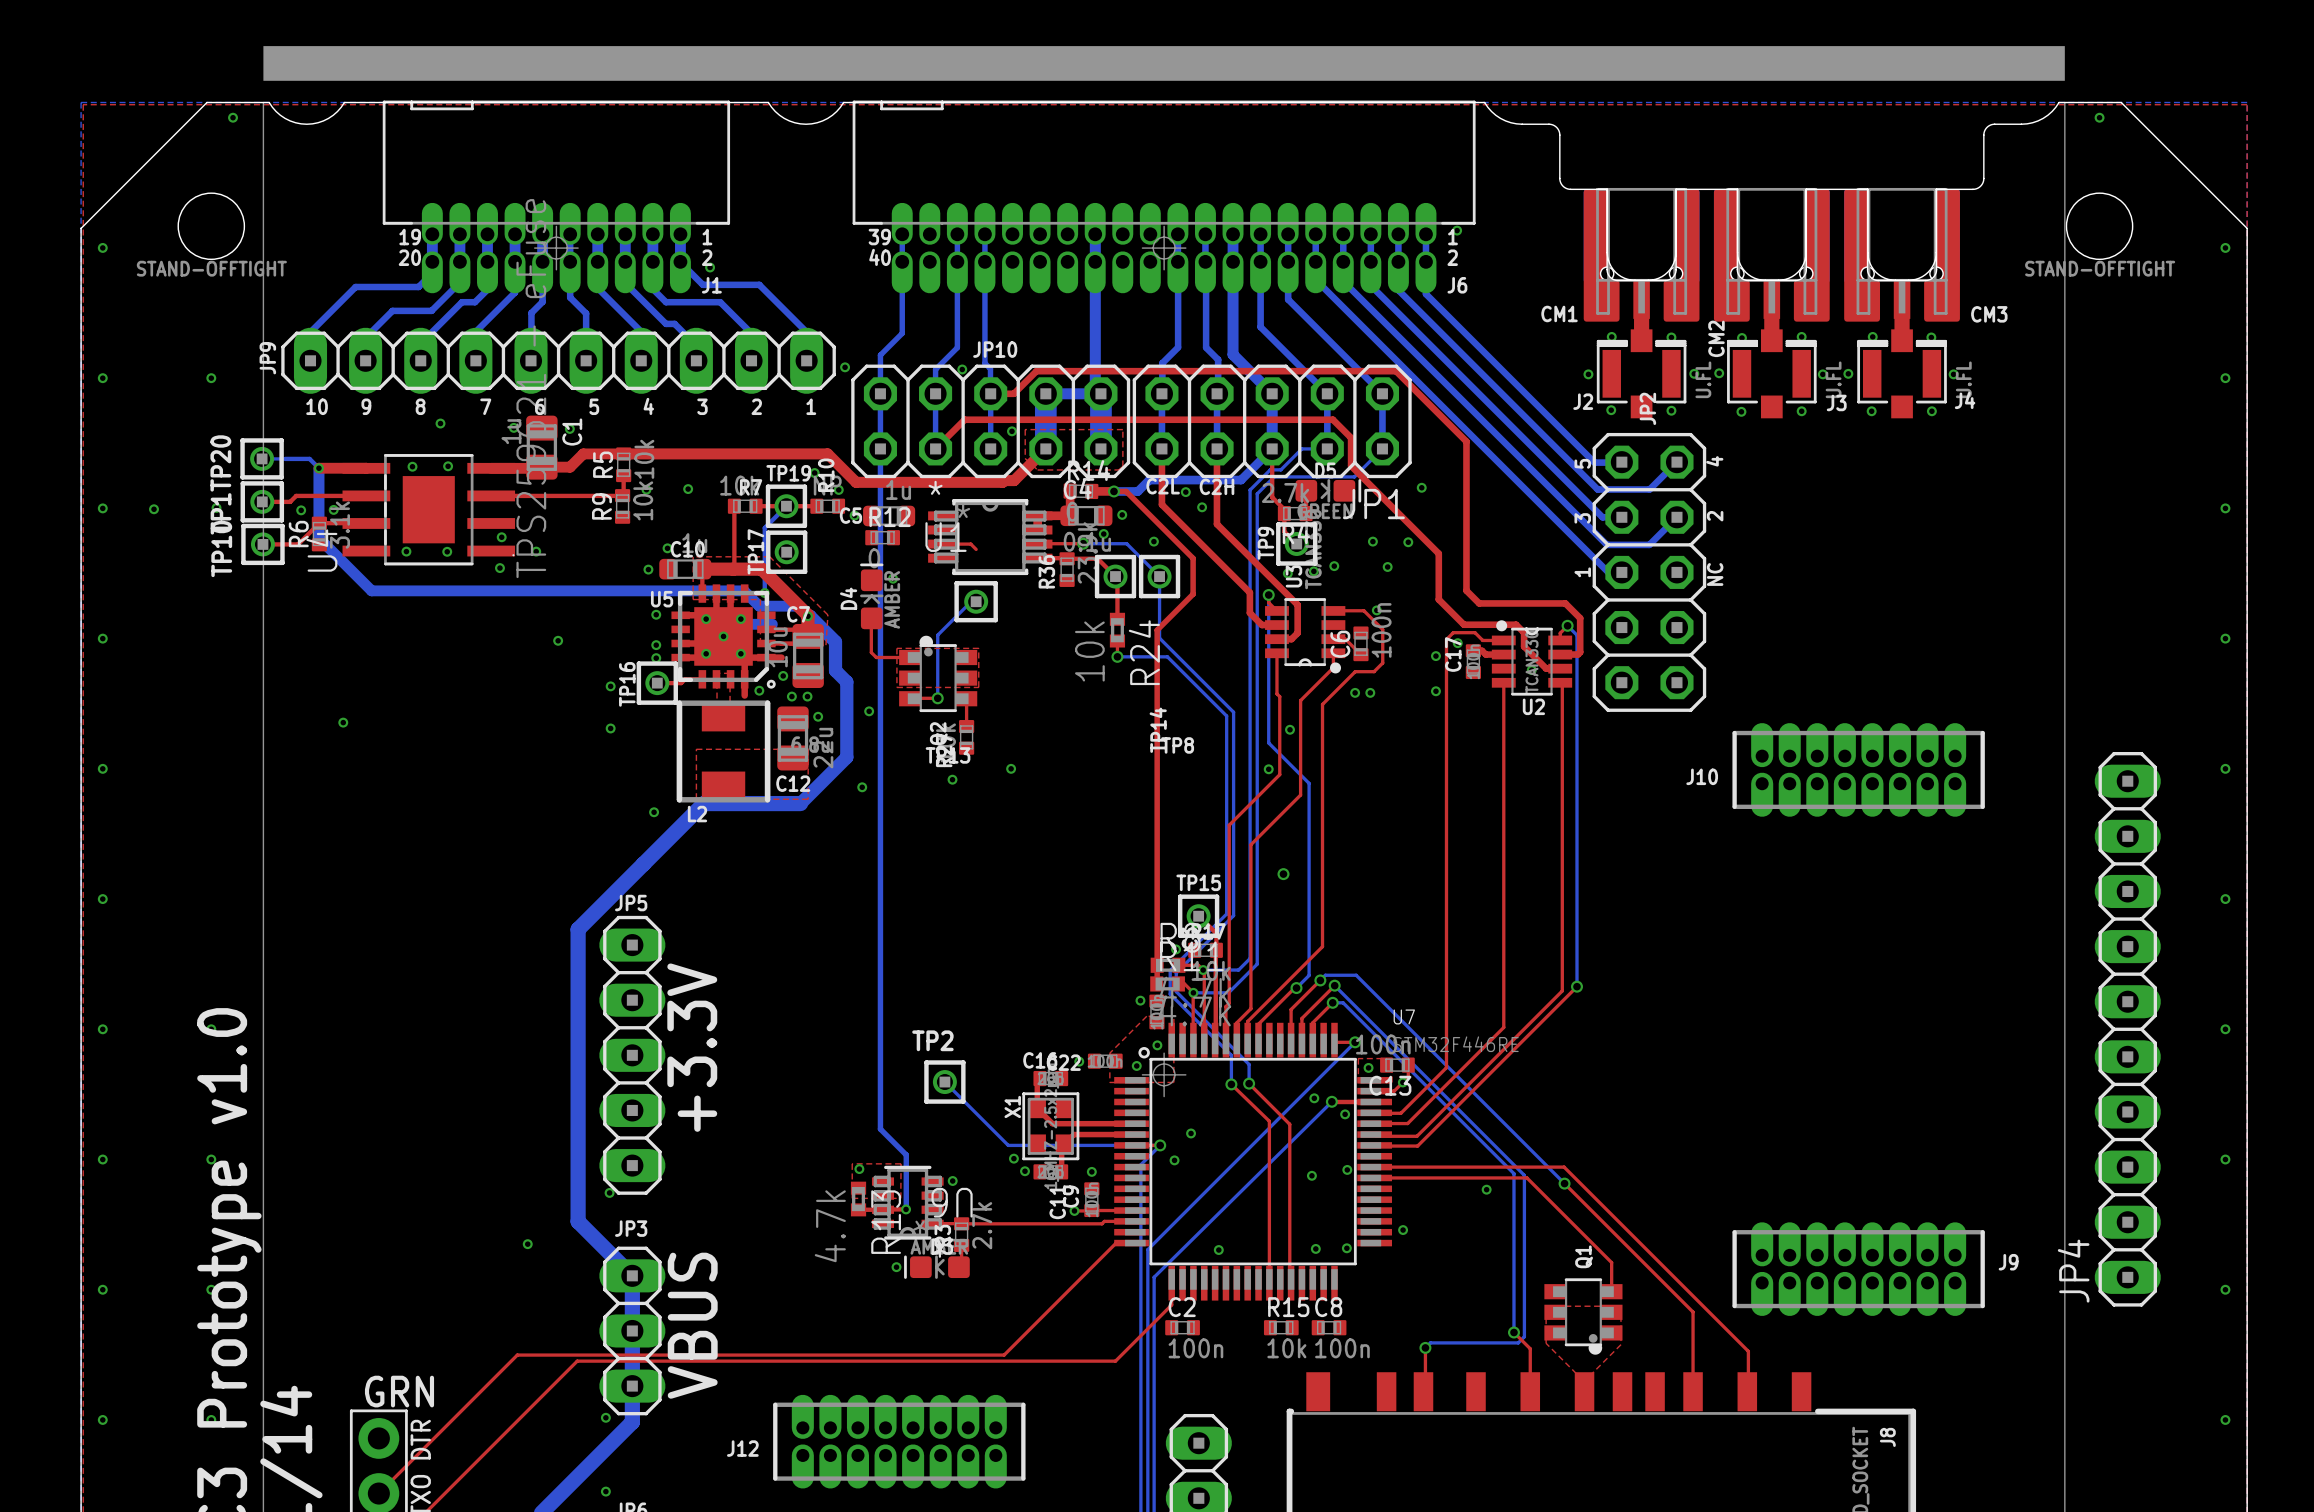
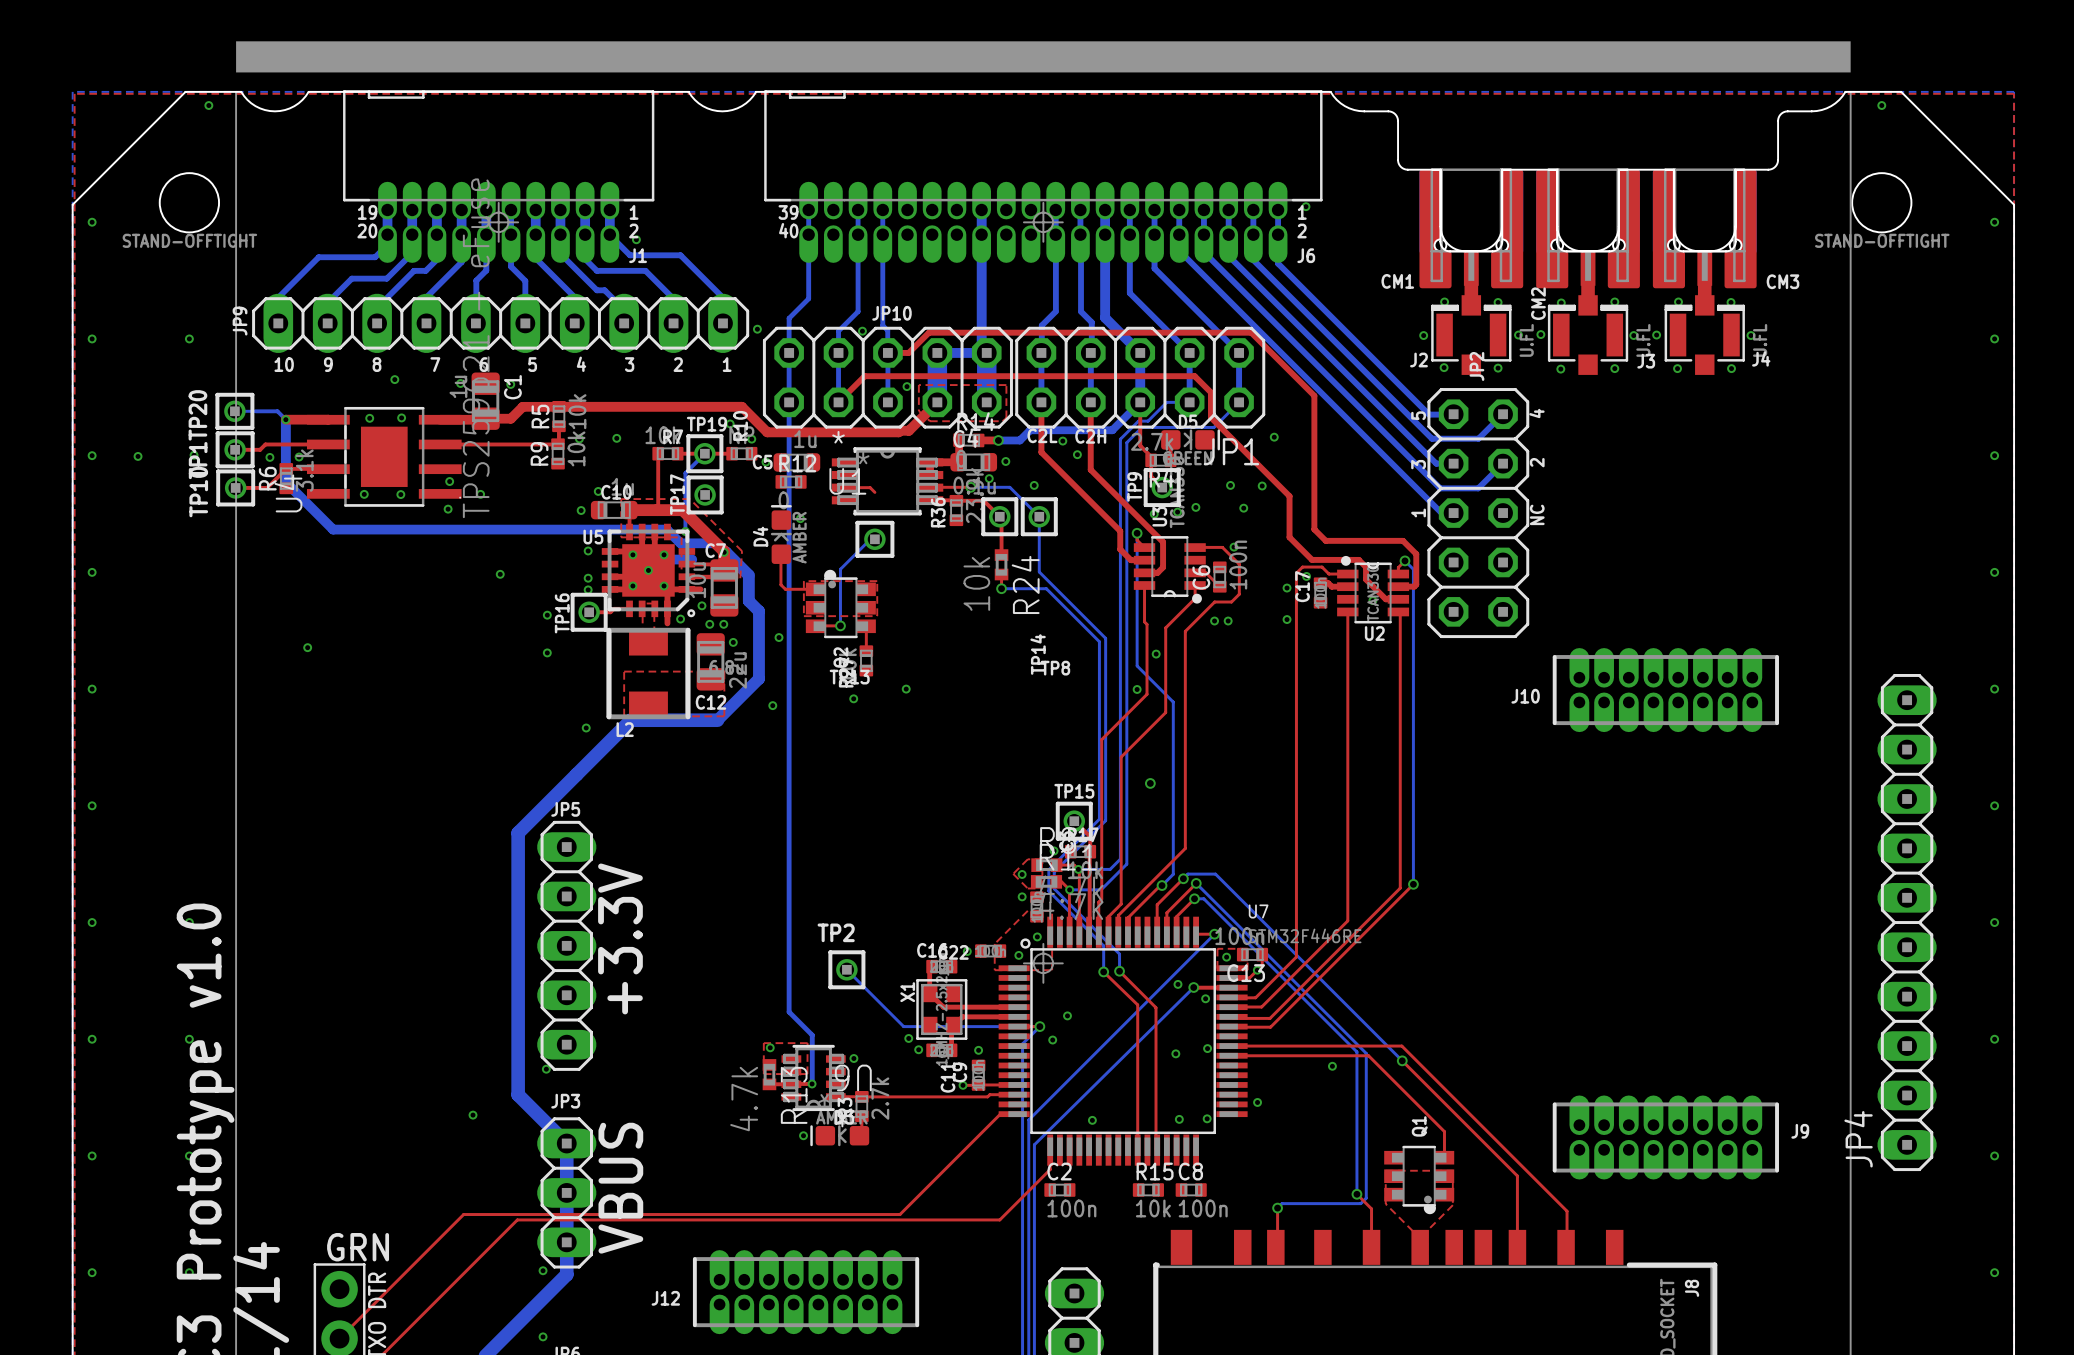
top track: (1113, 491) (1126, 491) (1193, 558) (1193, 594) (1157, 630) (1156, 983) -> none
top zone outline: none -> (1027, 859) (1042, 859) (1042, 888) (1027, 888) (1013, 873) (1027, 859)
via: none -> (1022, 874)

